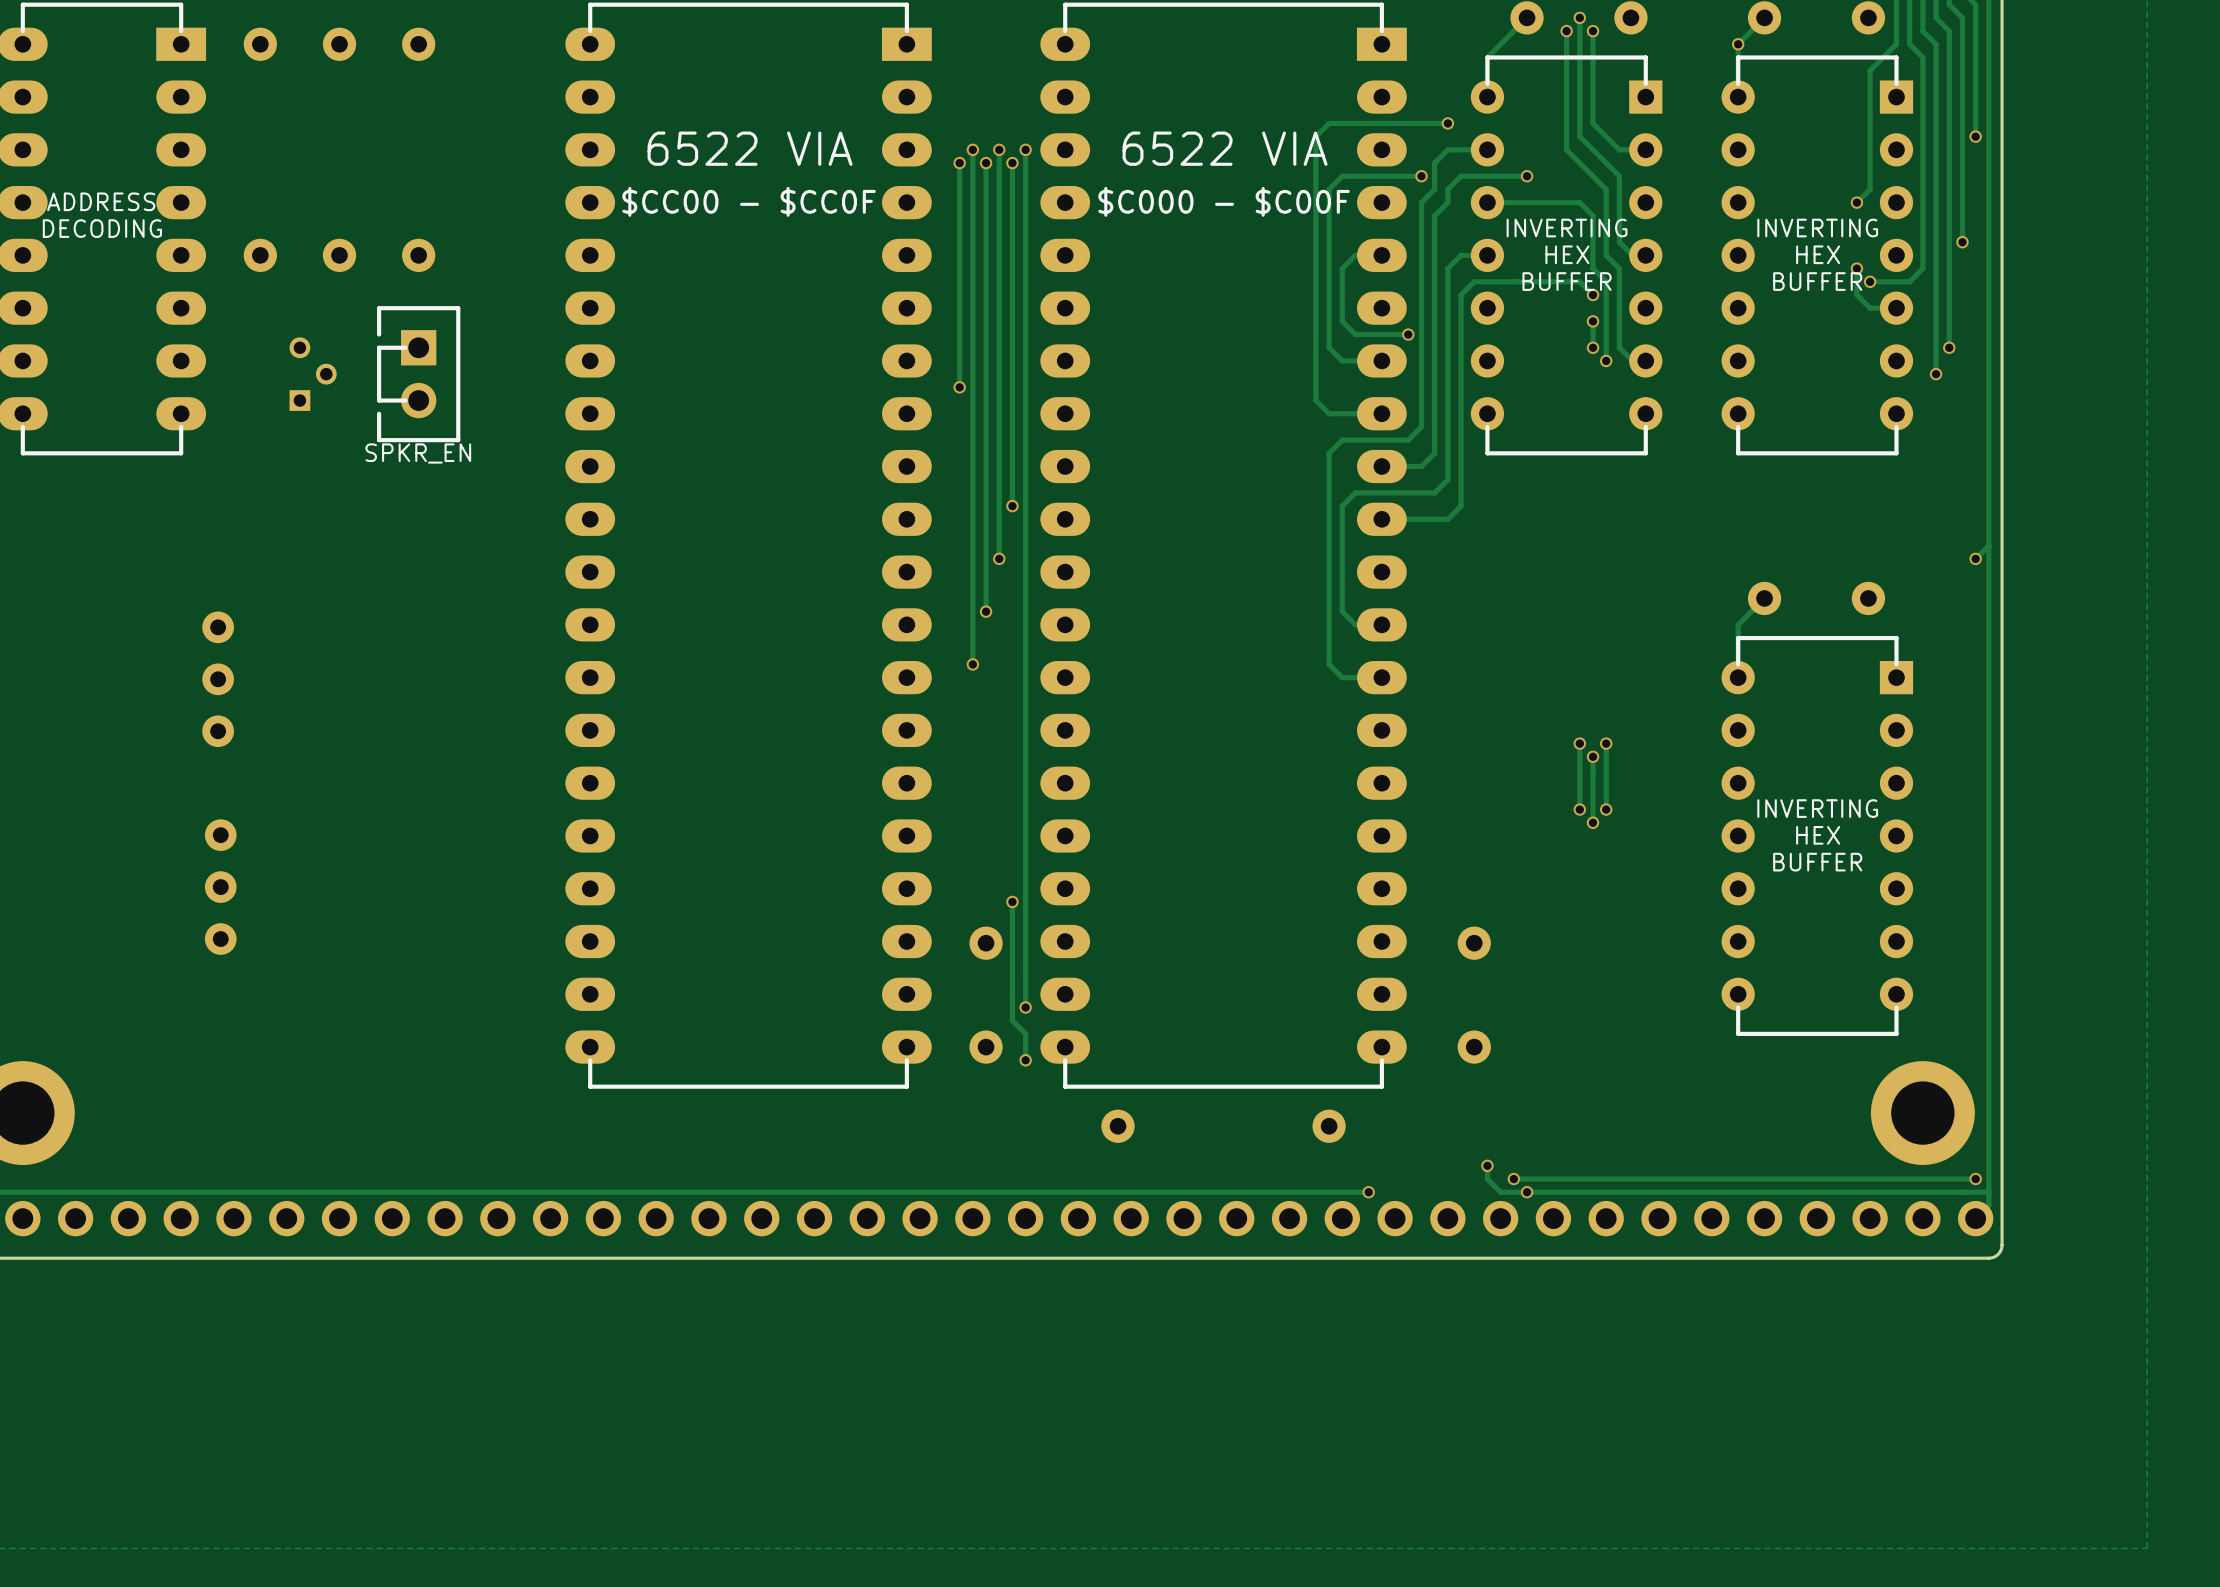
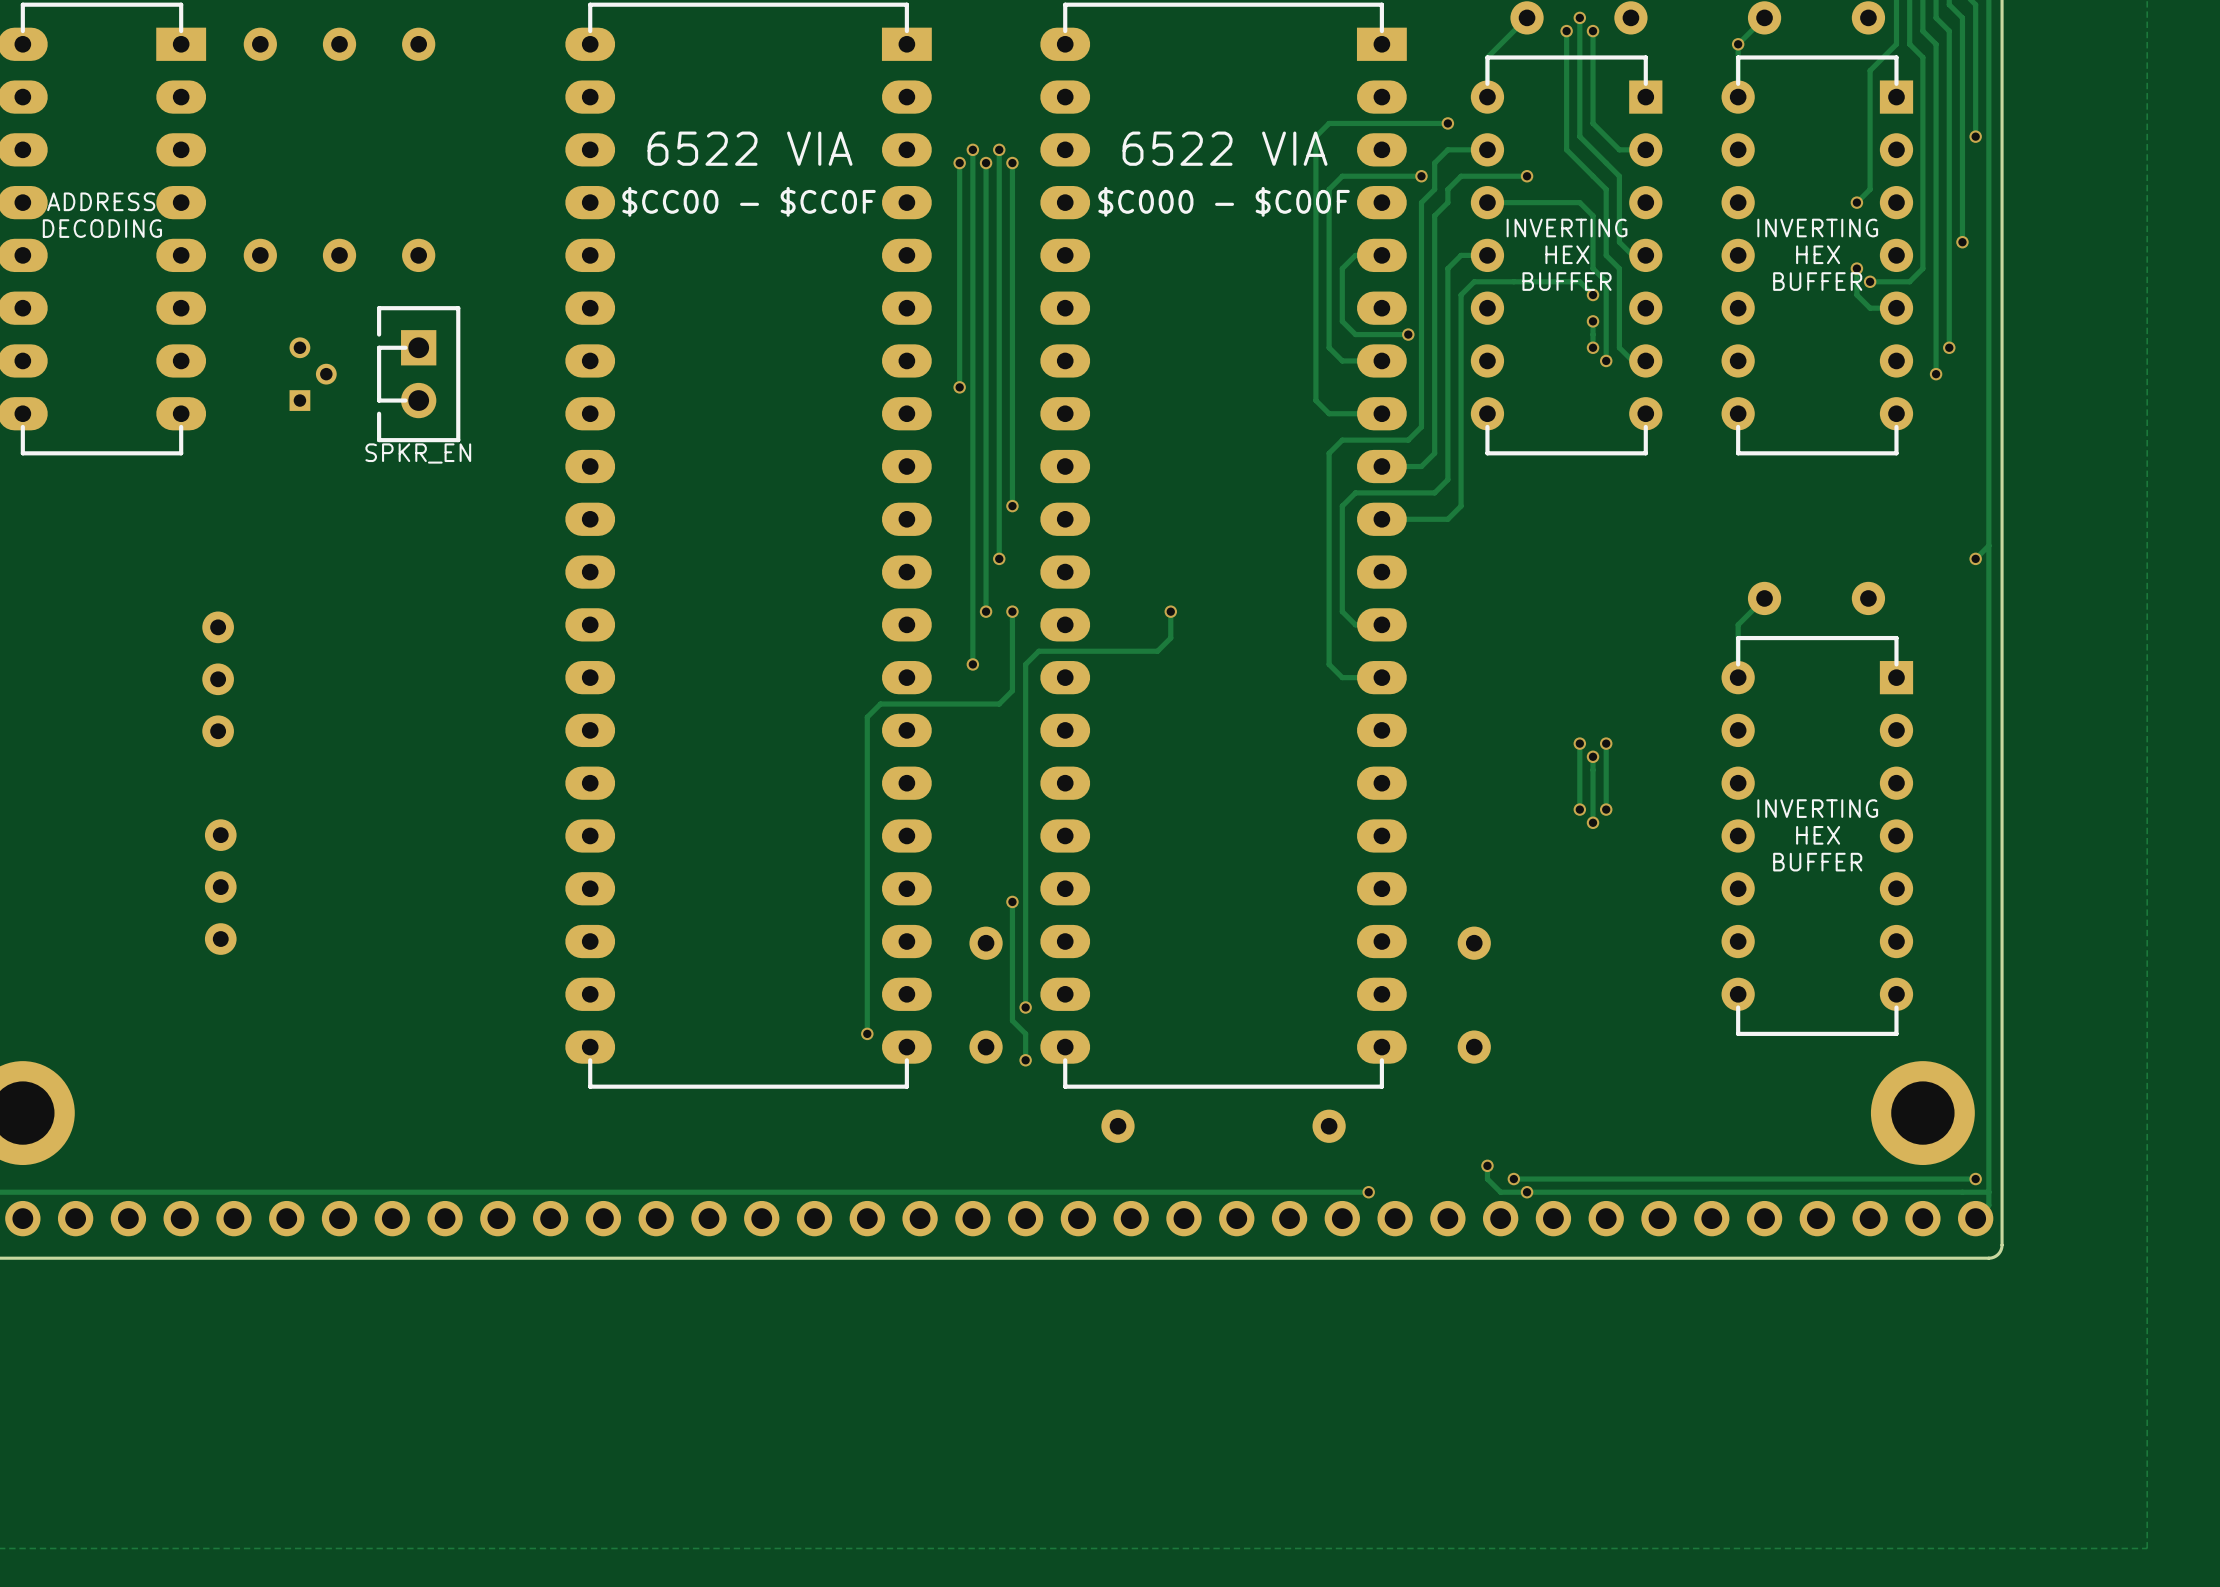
track: (1025, 149) (1025, 664) -> (1170, 611) (1170, 638) (1157, 651) (1038, 651) (1025, 664)
via: (1025, 149) -> none
track: none -> (1012, 611) (1012, 690) (999, 704) (880, 704) (867, 717) (867, 1033)
via: none -> (1012, 611)
via: none -> (1170, 611)
via: none -> (867, 1033)

